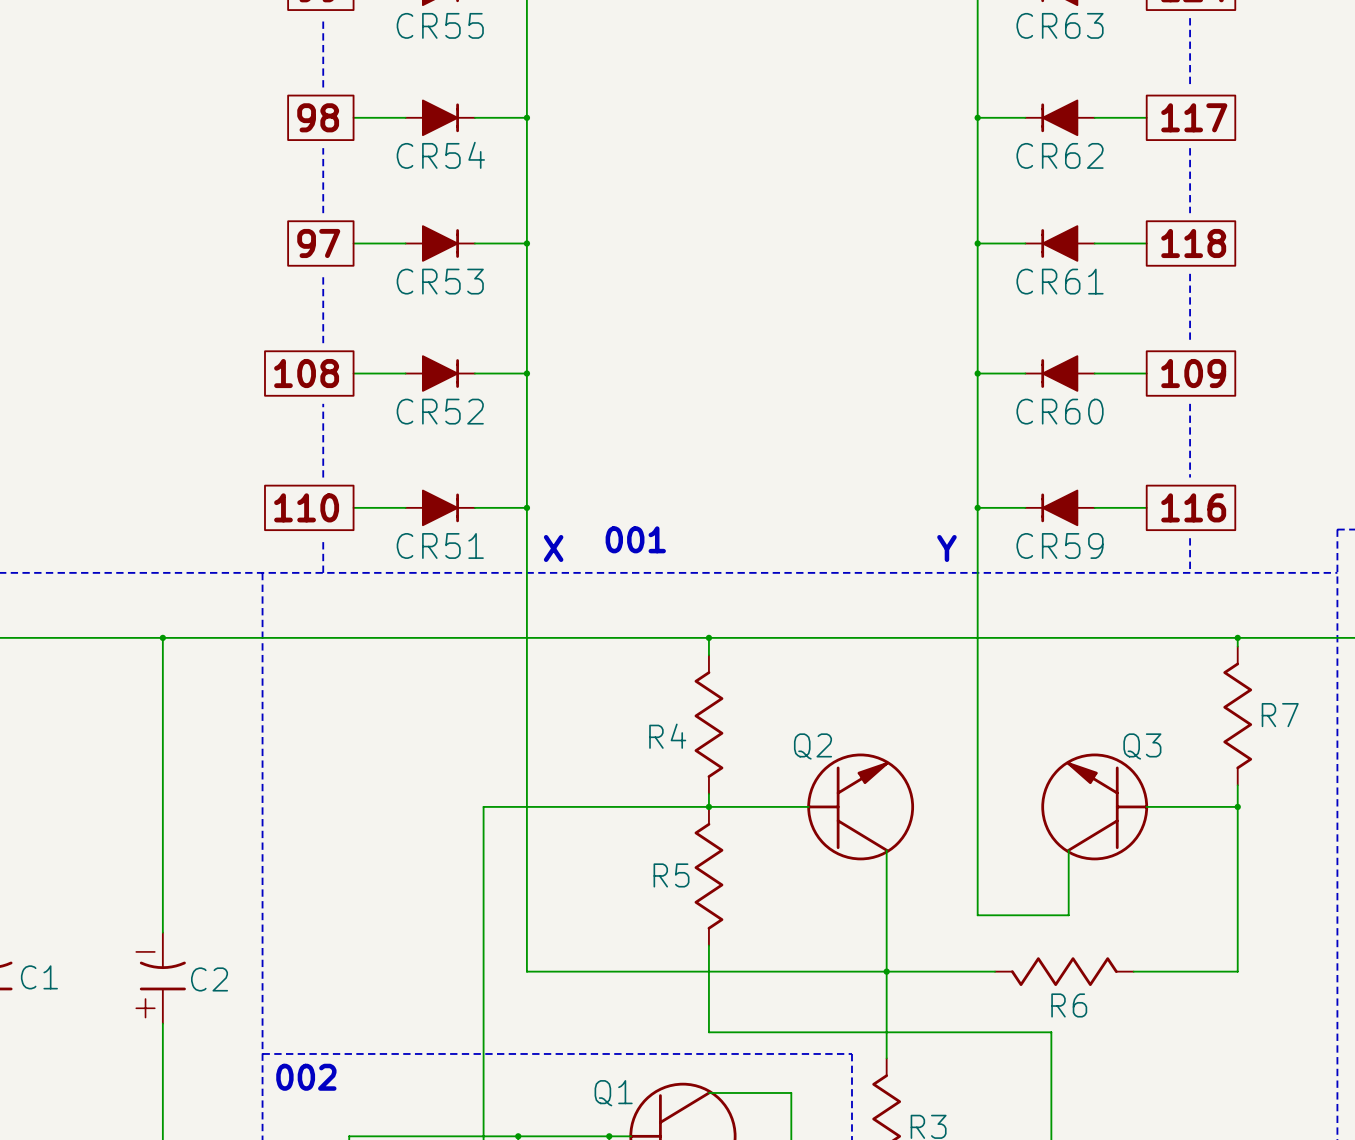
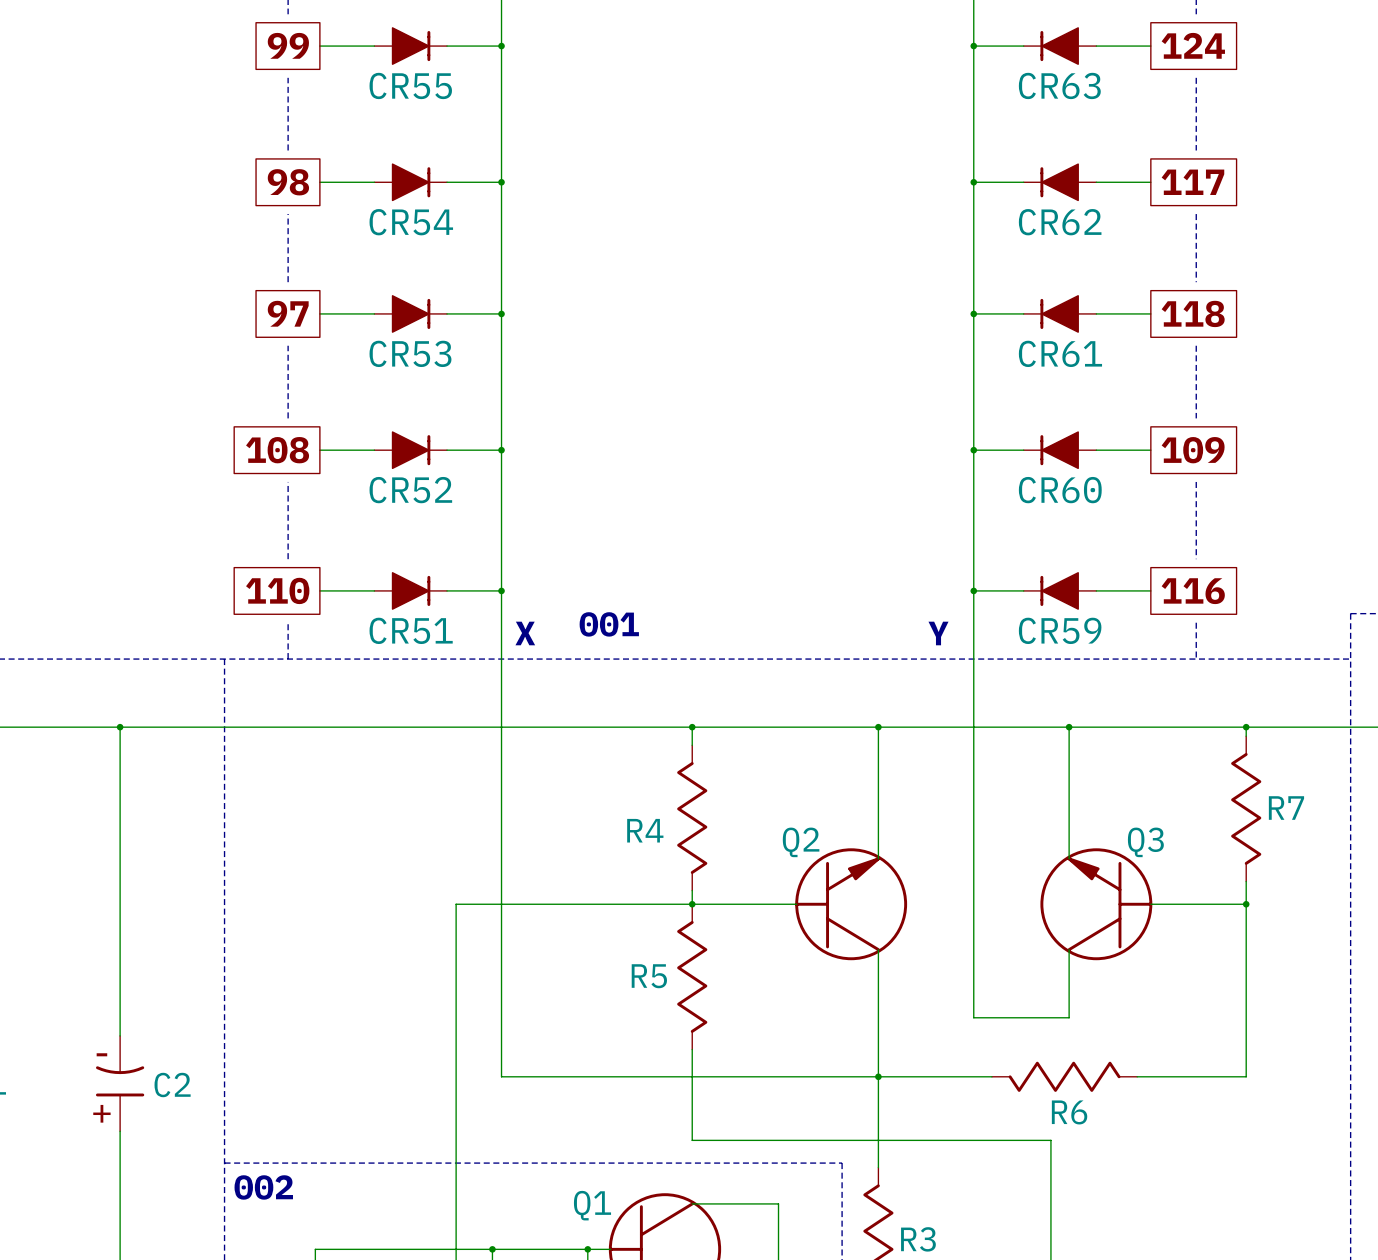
wire: none -> (878, 727) (878, 858)
junction: none -> (878, 727)
wire: none -> (1069, 727) (1069, 858)
junction: none -> (1069, 727)

